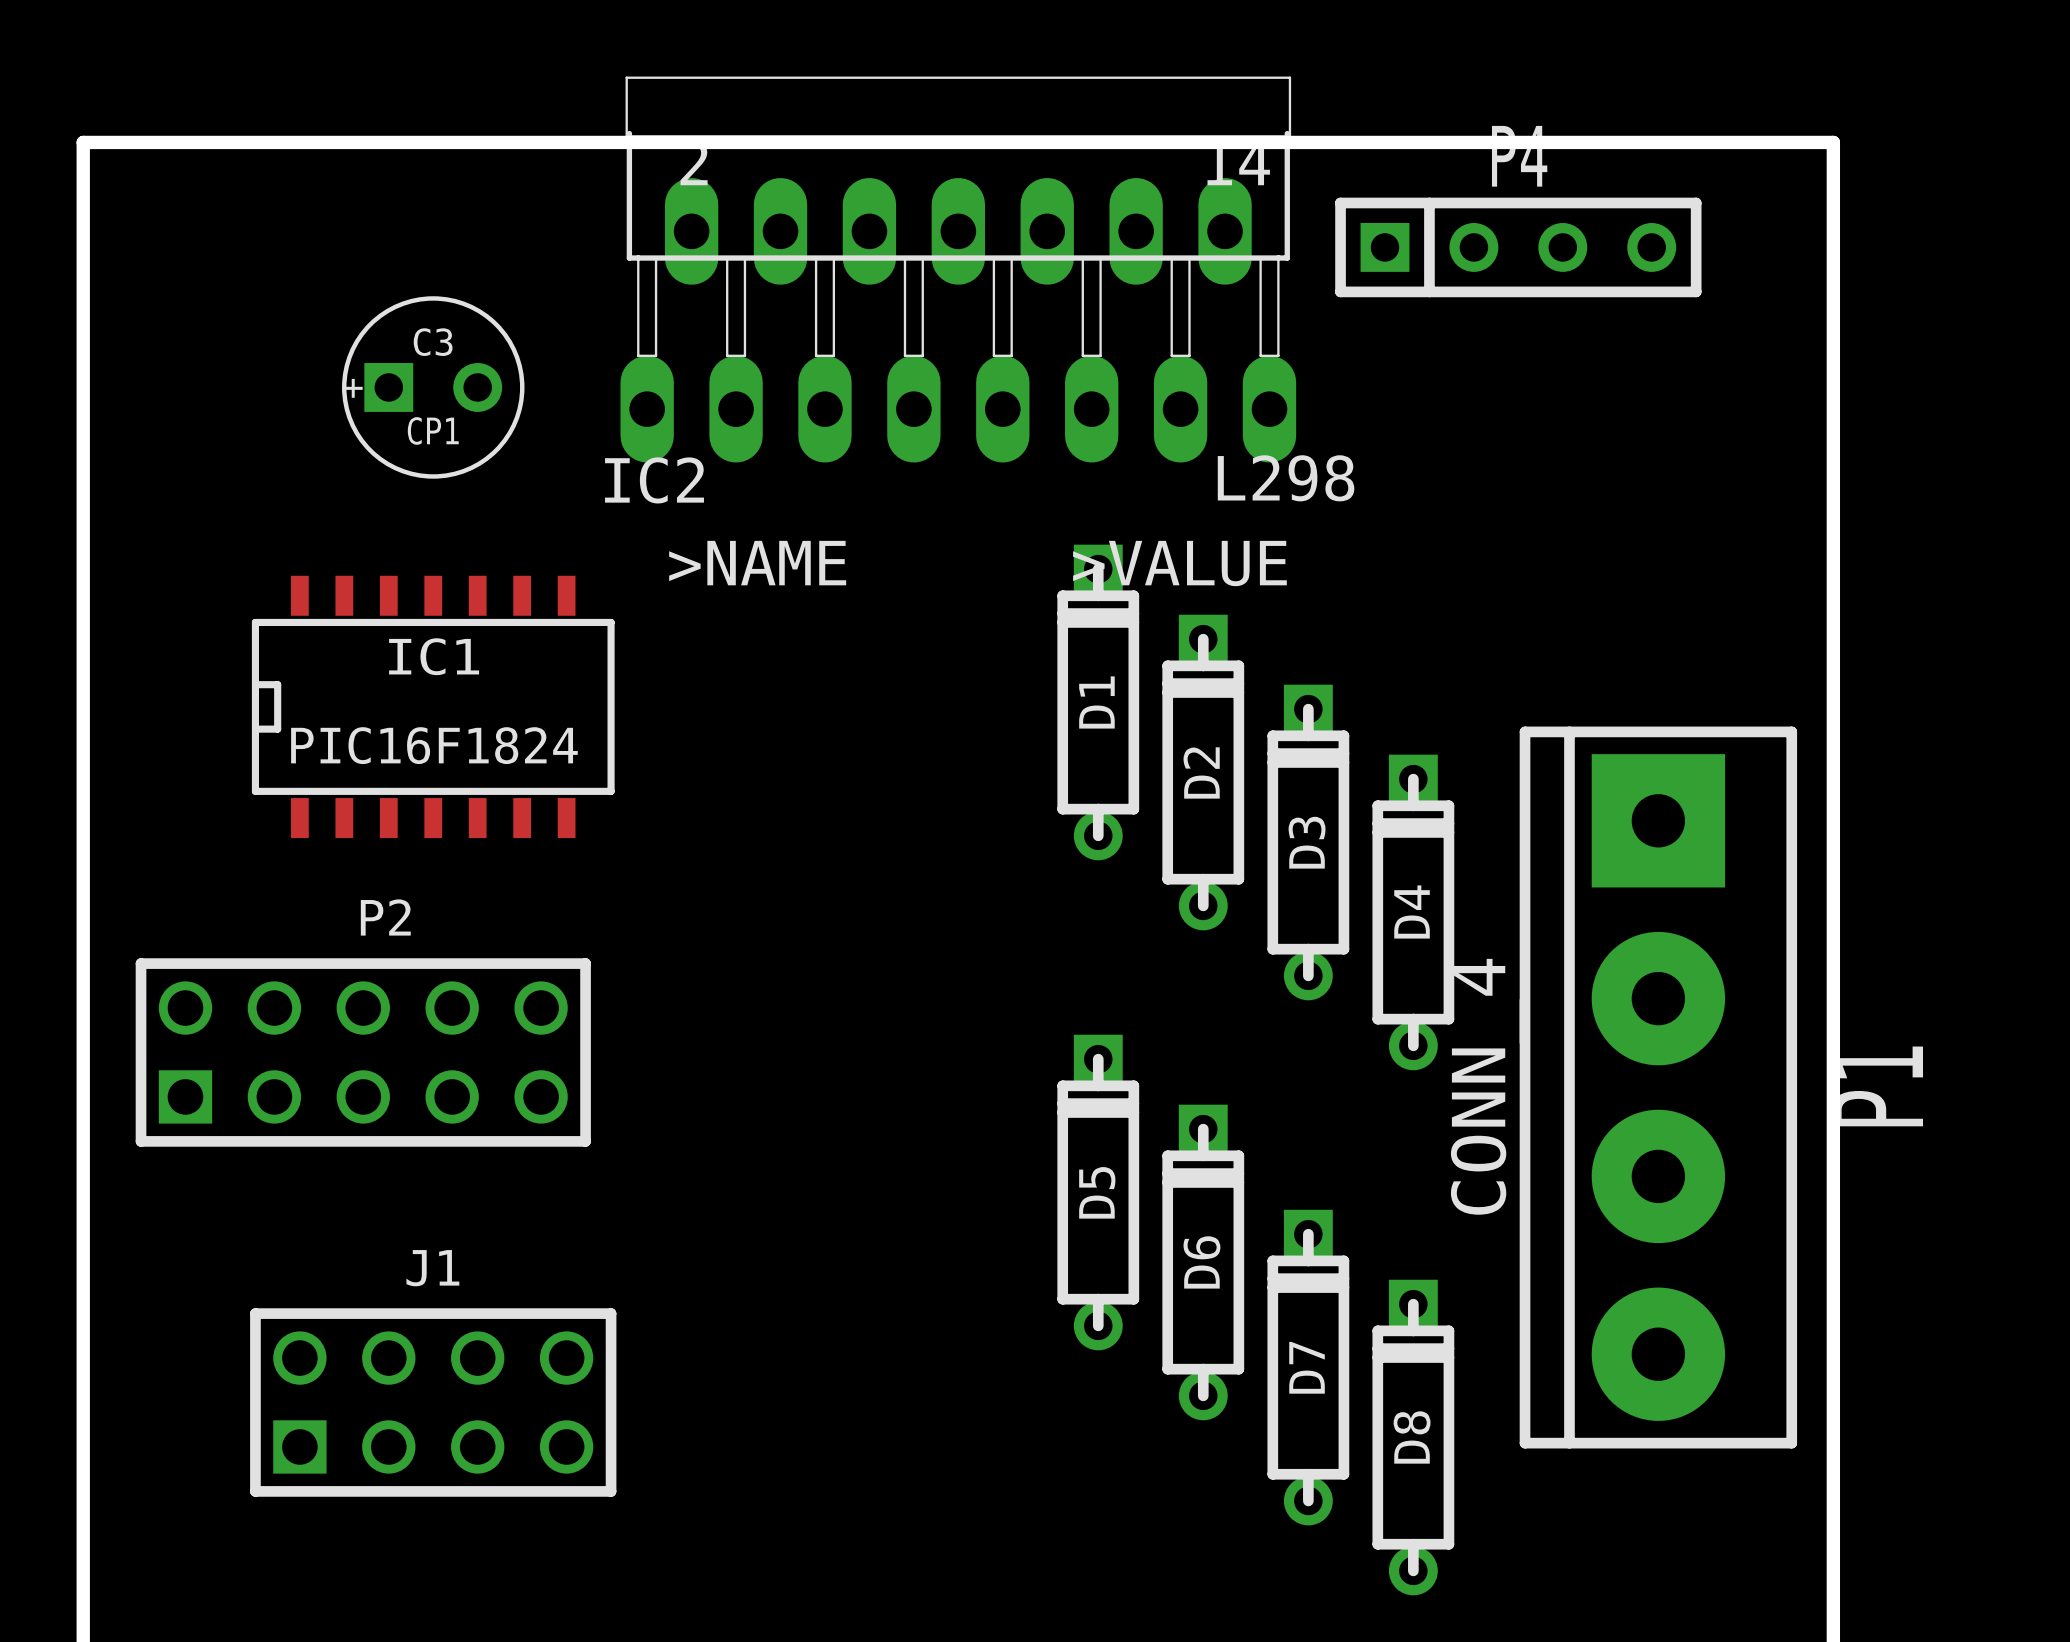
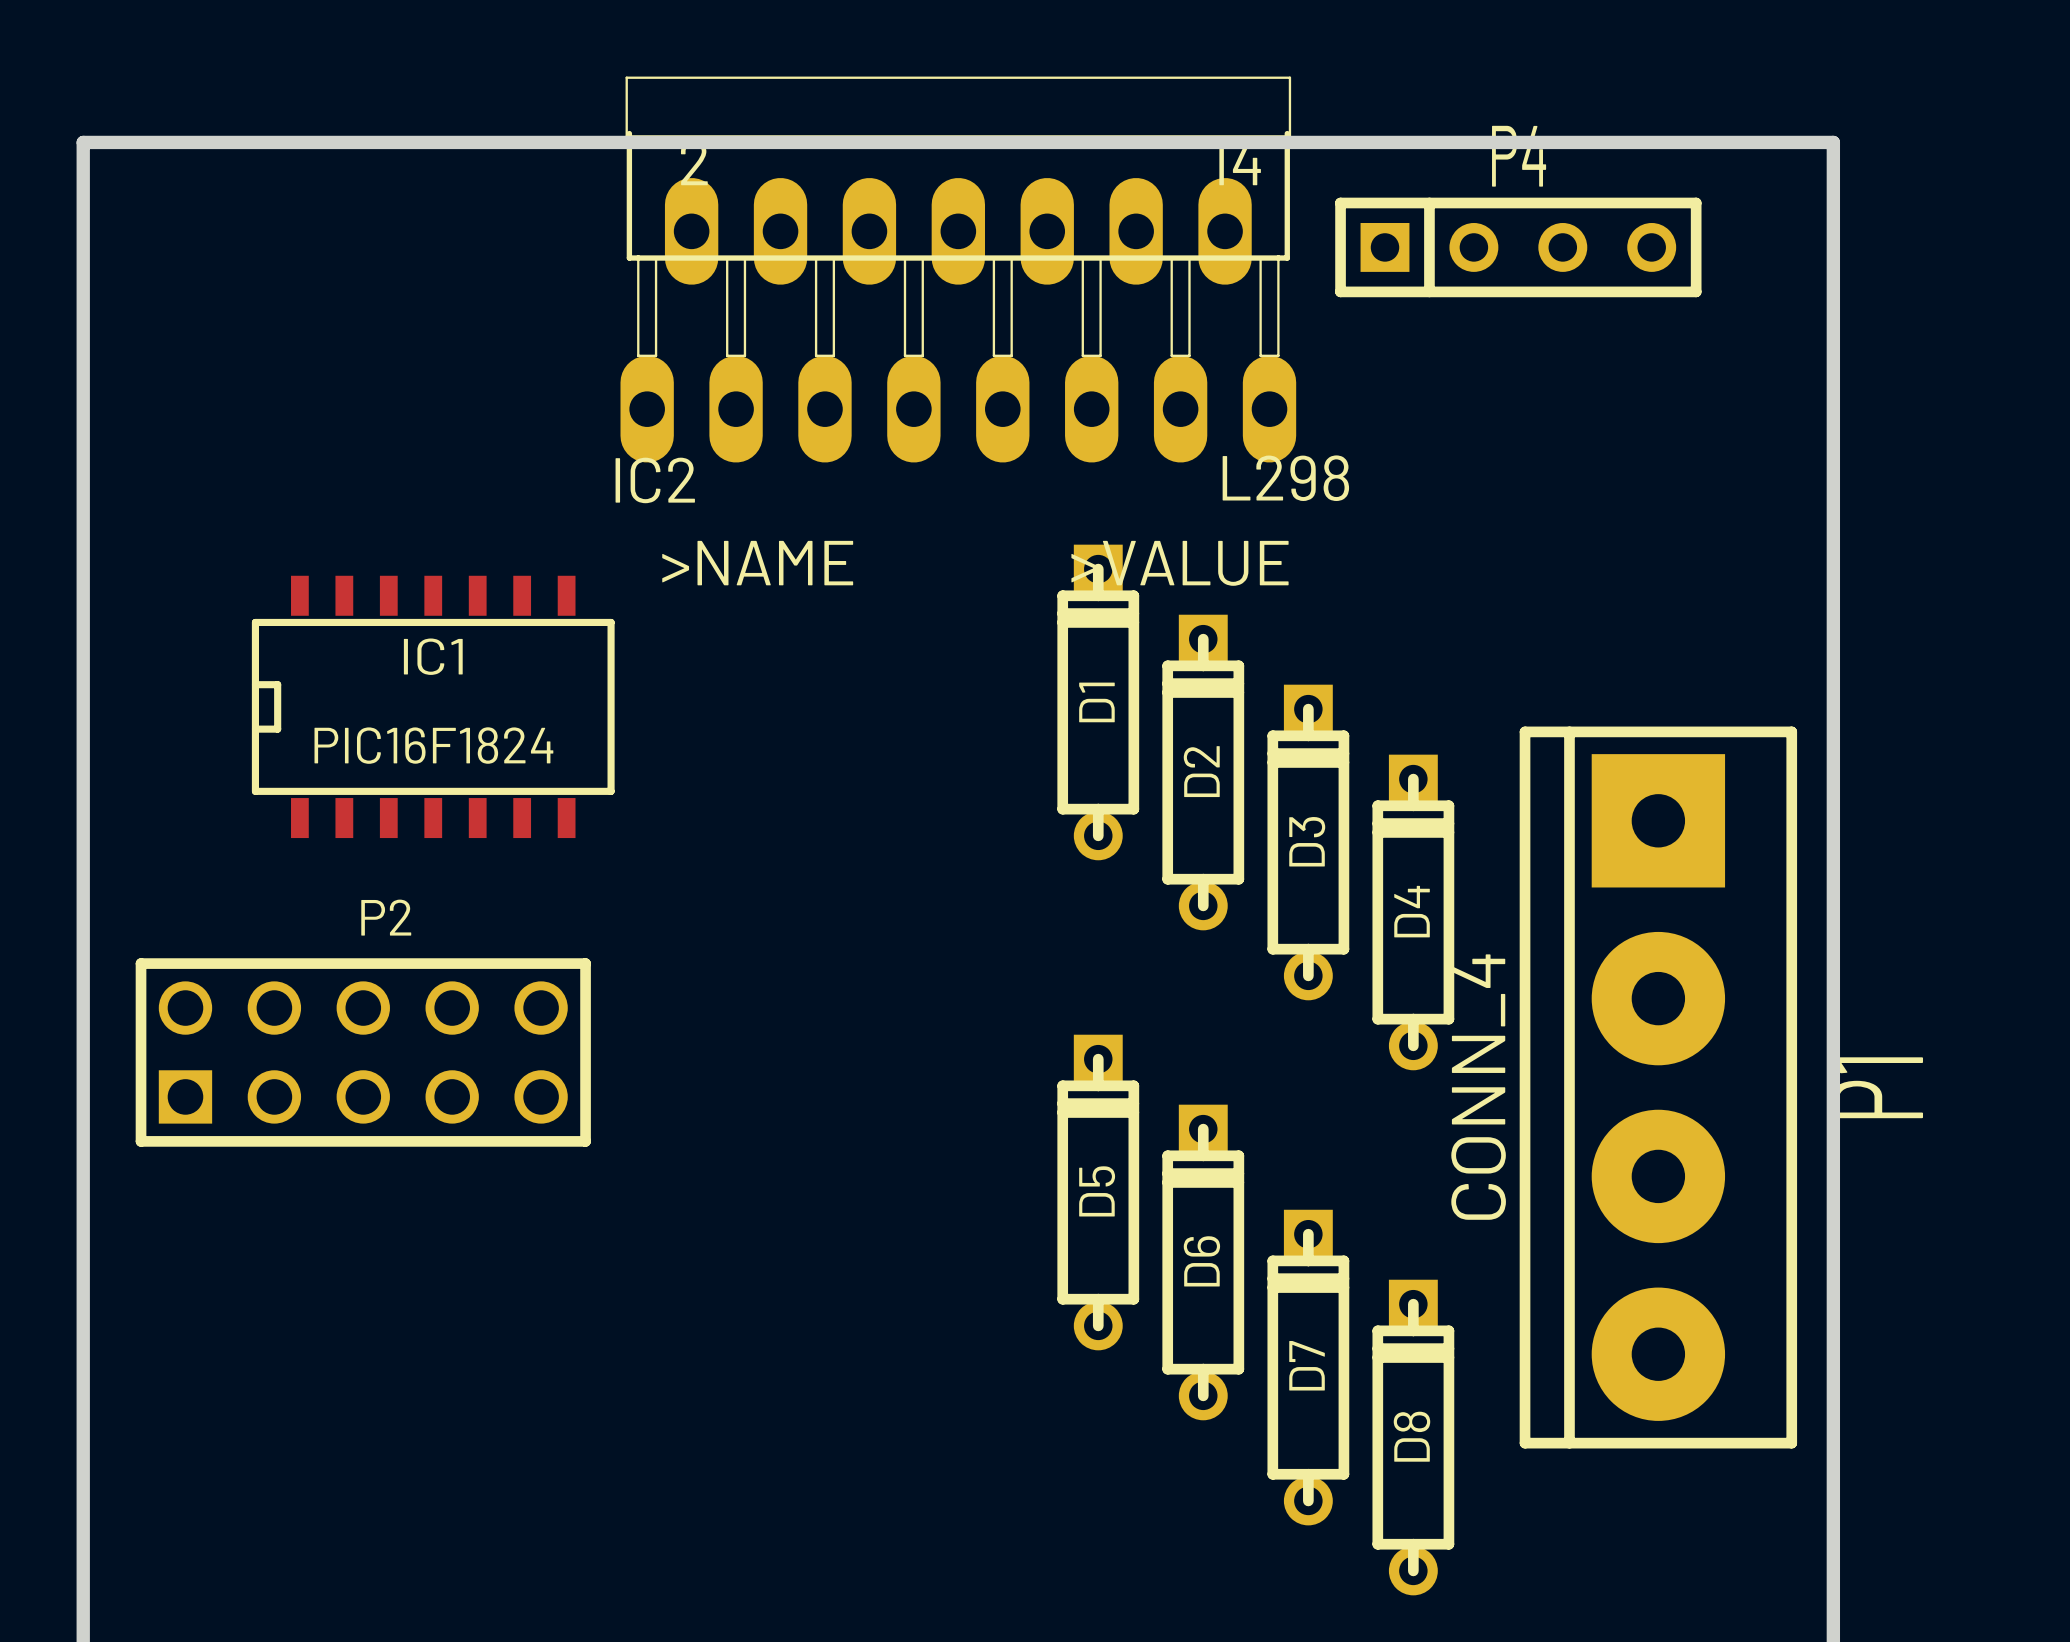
C3: CP1 (433, 387) -> none
J1: (433, 1402) -> none

